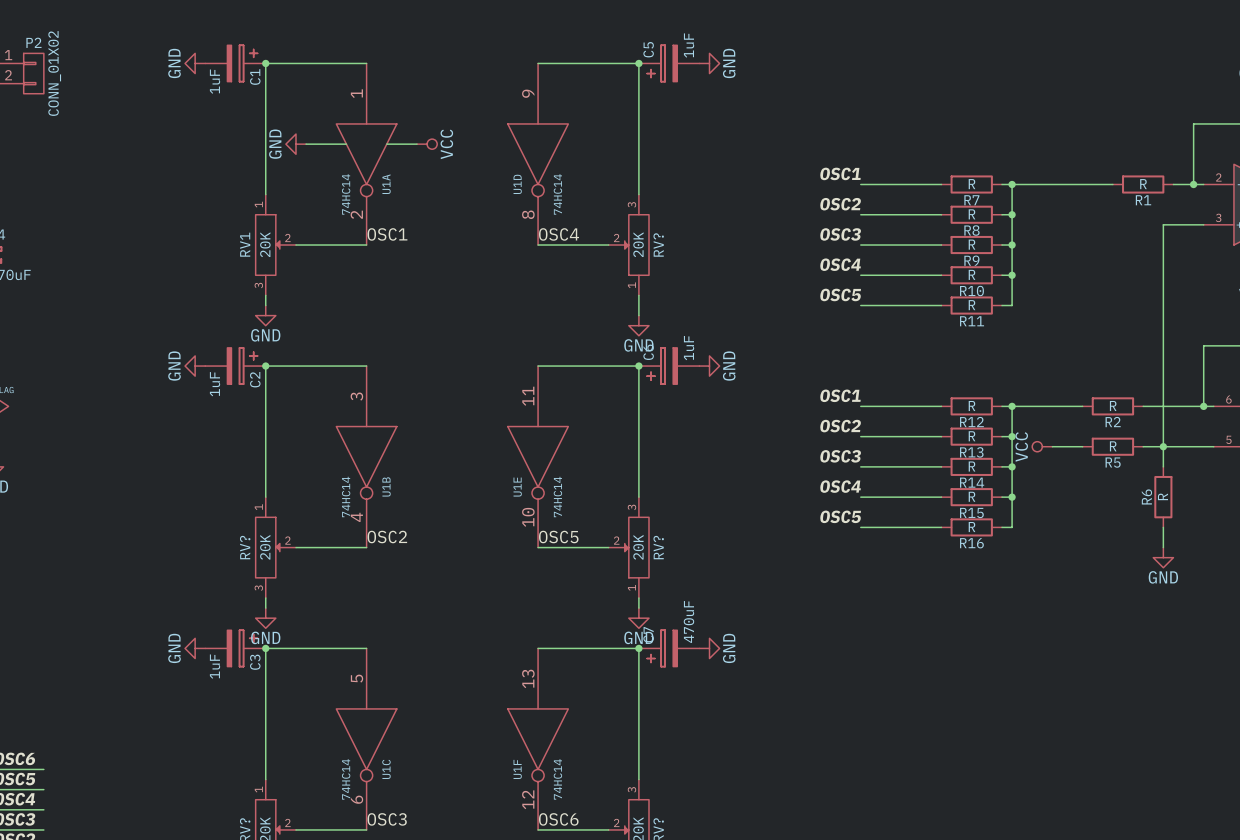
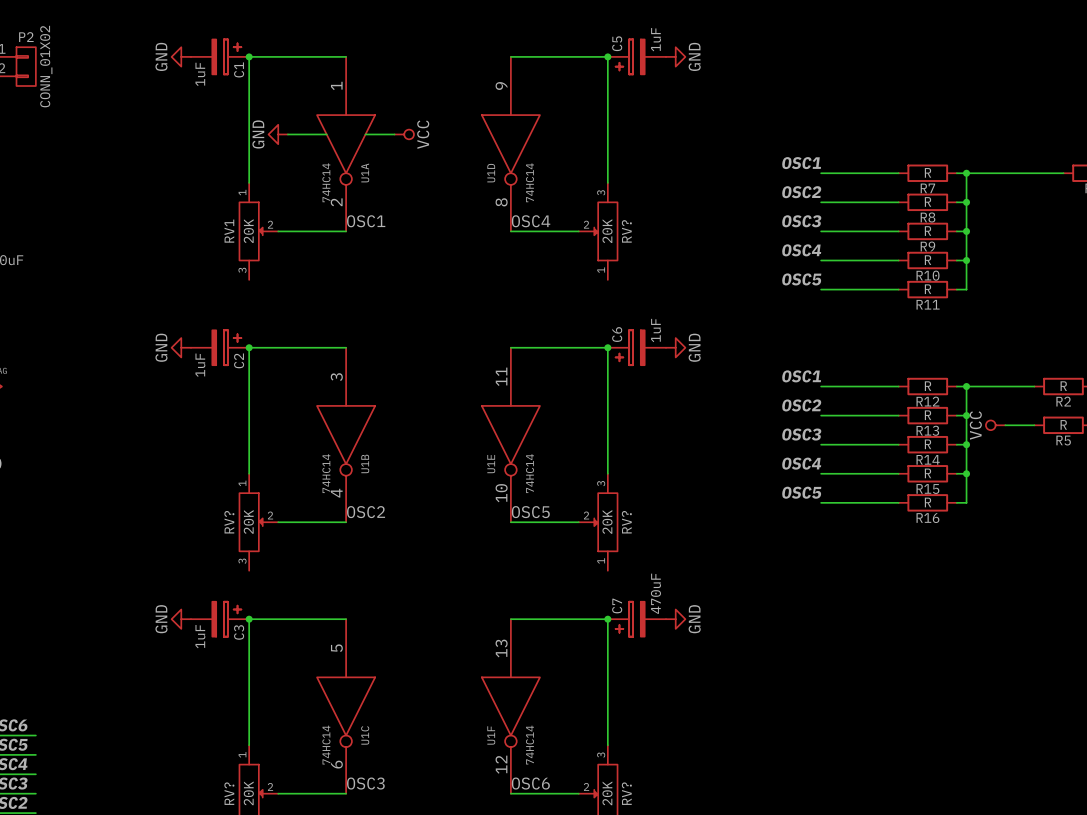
wire: (265, 295) (265, 305) -> none
wire: (638, 295) (638, 315) -> none
power symbol: GND (265, 315) -> none
power symbol: GND (638, 325) -> none
wire: (265, 598) (265, 608) -> none
wire: (638, 598) (638, 608) -> none
power symbol: GND (265, 618) -> none
power symbol: GND (638, 618) -> none

